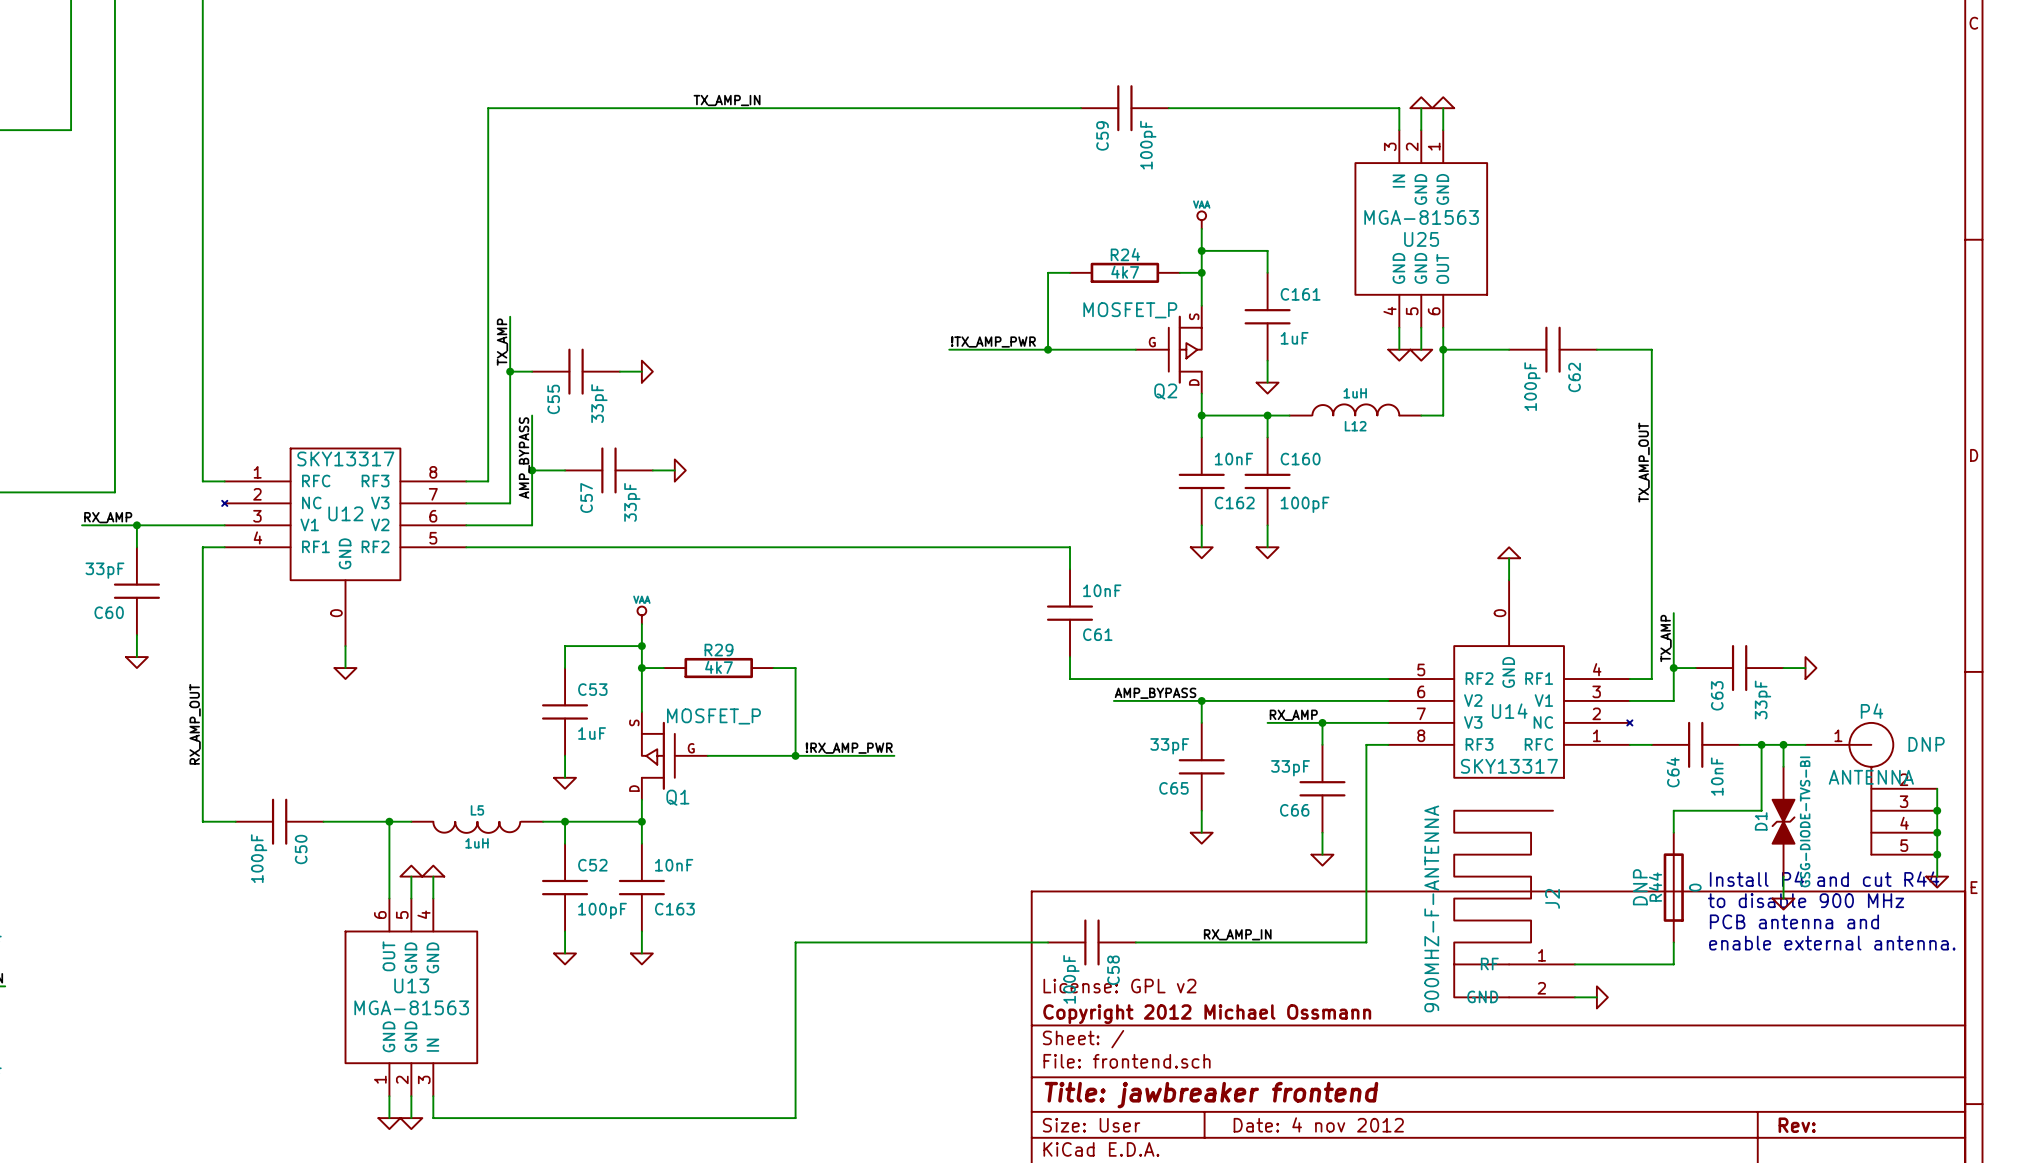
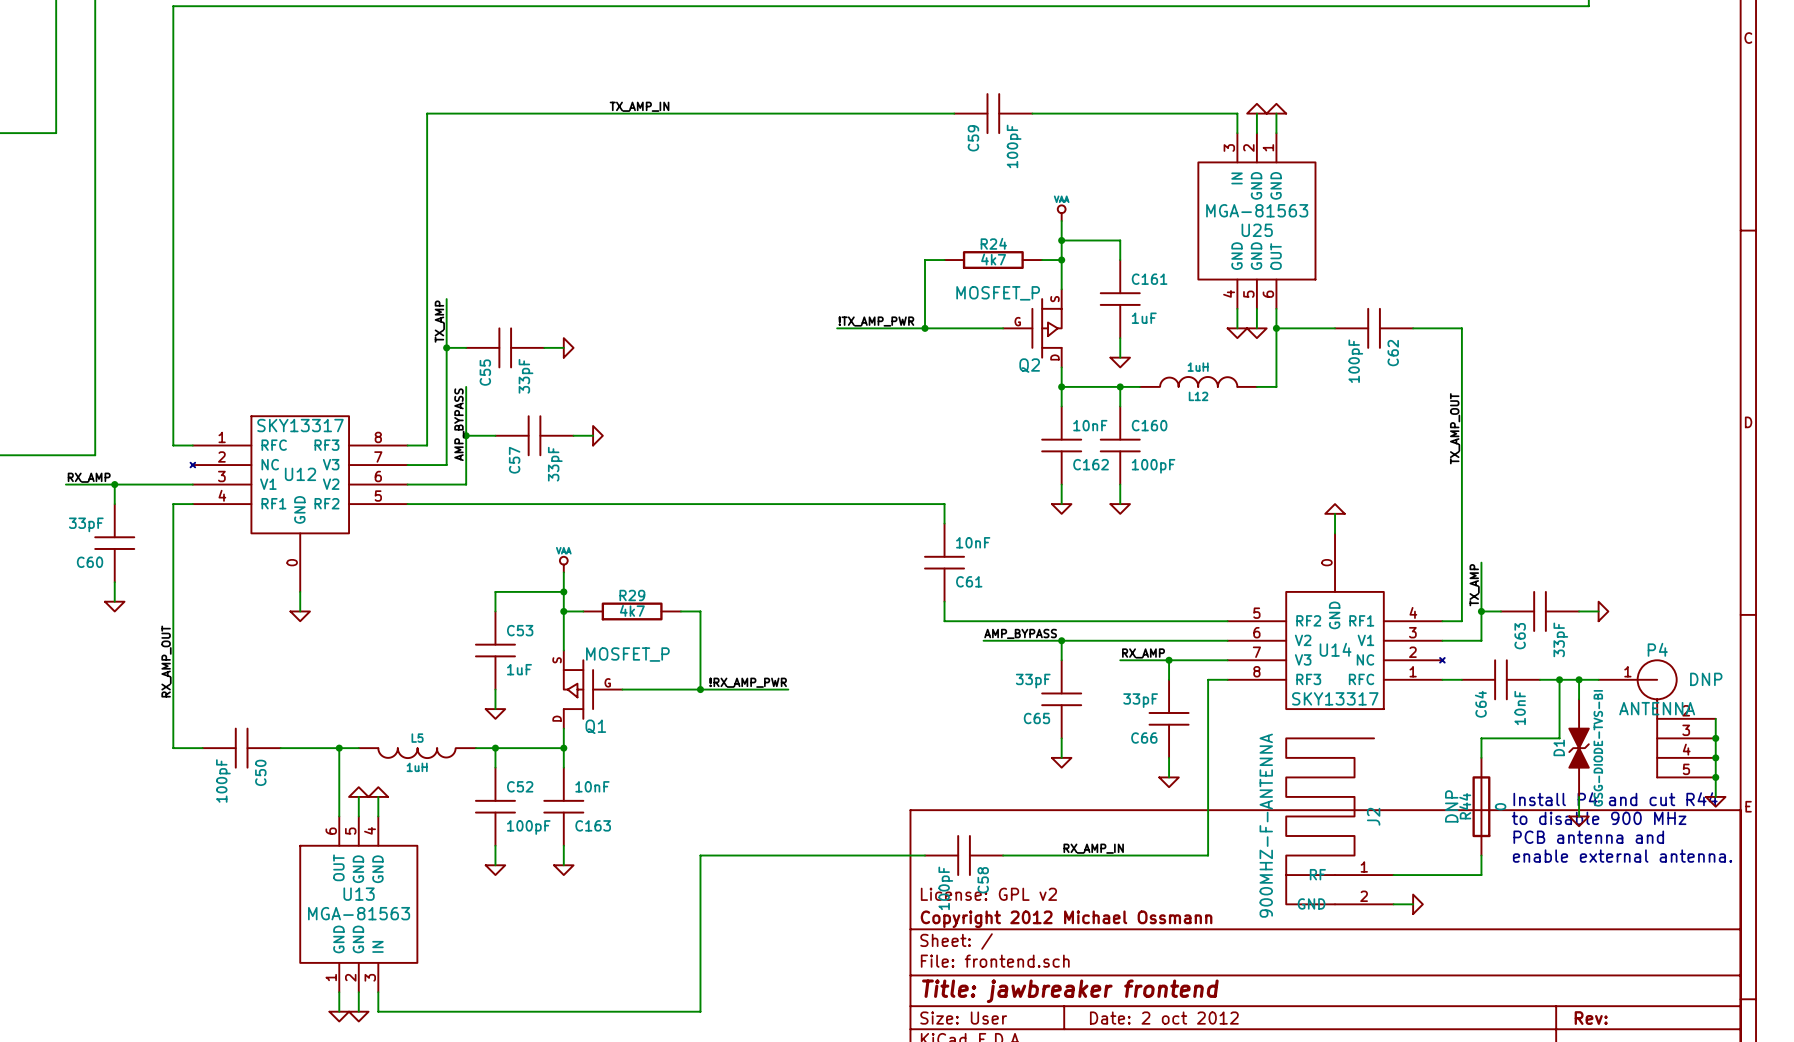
title block: Date: 4 nov 2012 (1318, 1124) -> Date: 2 oct 2012 (1164, 1018)

